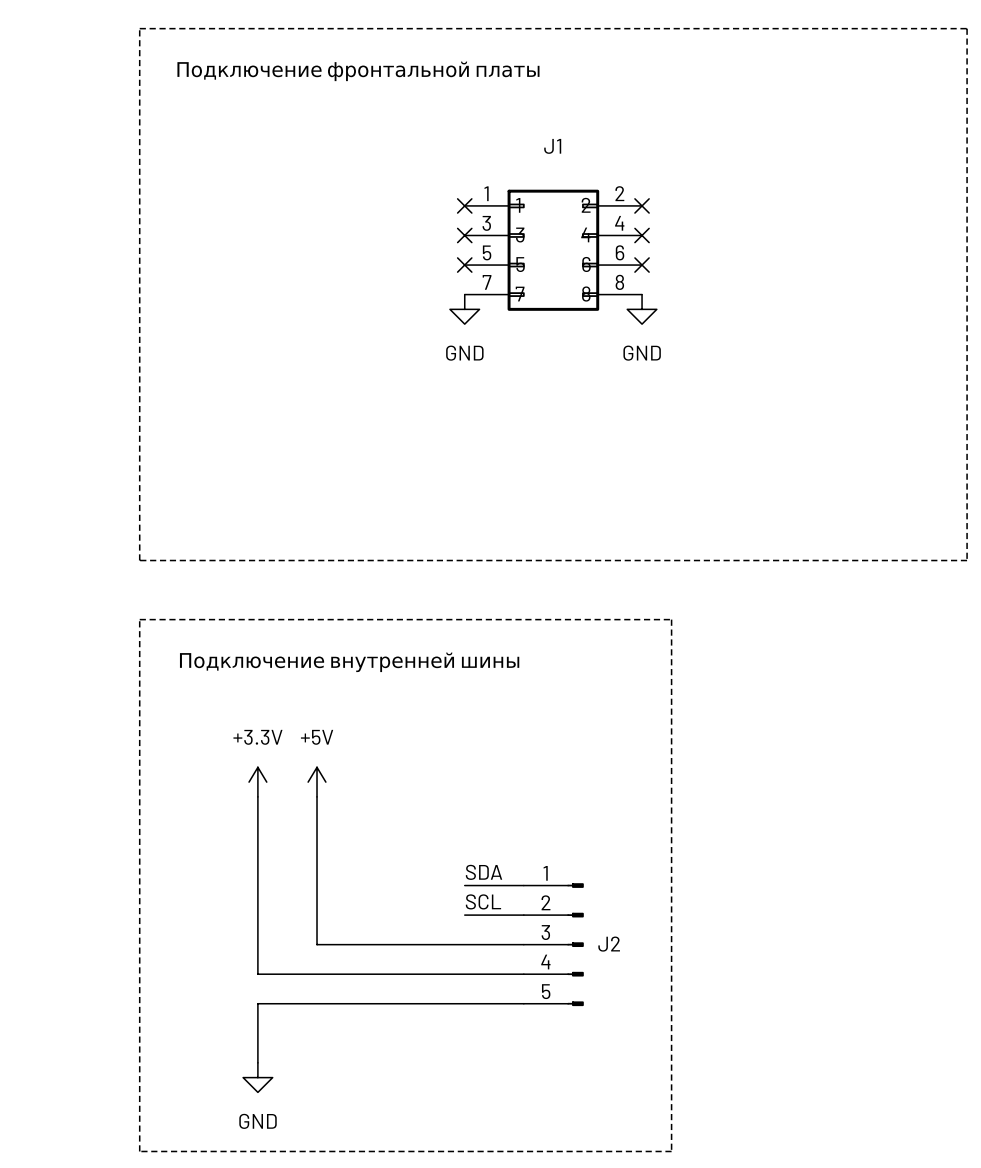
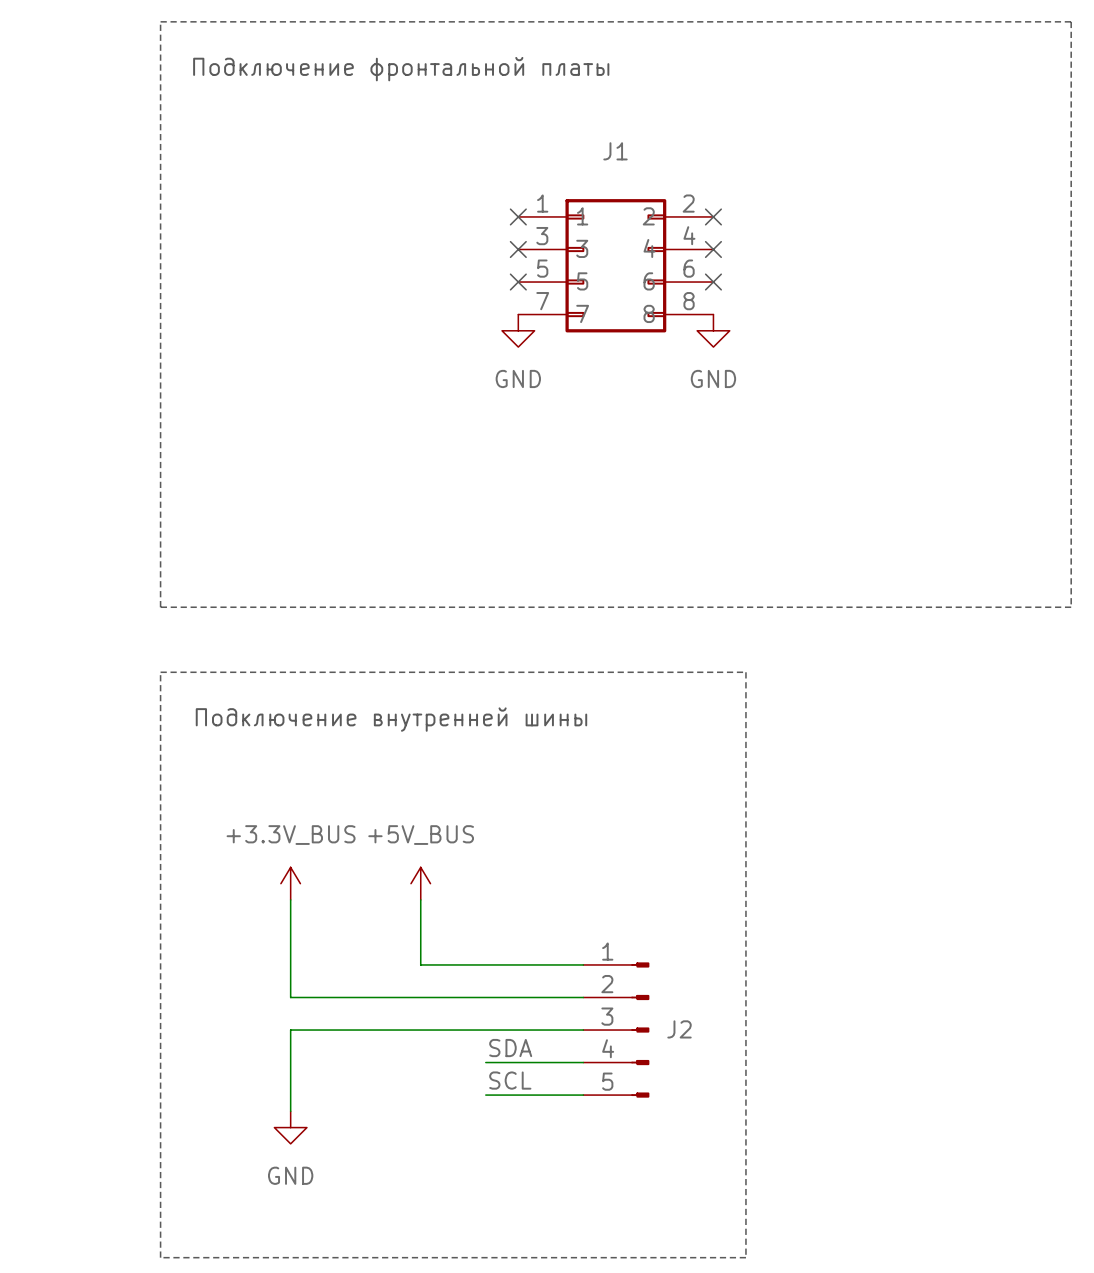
power symbol: +3.3V (257, 782) -> none
power symbol: +5V (317, 782) -> none
wire: (317, 796) (317, 944) -> none
power symbol: none -> +3.3V_BUS (290, 883)
power symbol: none -> +5V_BUS (420, 883)
wire: none -> (420, 899) (420, 964) (518, 964)
label position: SDA (484, 872) -> SDA (510, 1048)
label position: SCL (483, 901) -> SCL (510, 1080)
wire: (257, 915) (257, 944) -> (355, 1030) (290, 1030)
wire: none -> (290, 997) (518, 997)
wire: (257, 974) (435, 974) -> (290, 1062) (290, 1095)
wire: (257, 1003) (435, 1003) -> none
wire: (257, 1018) (257, 1062) -> none
power symbol position: GND (257, 1077) -> GND (290, 1127)

